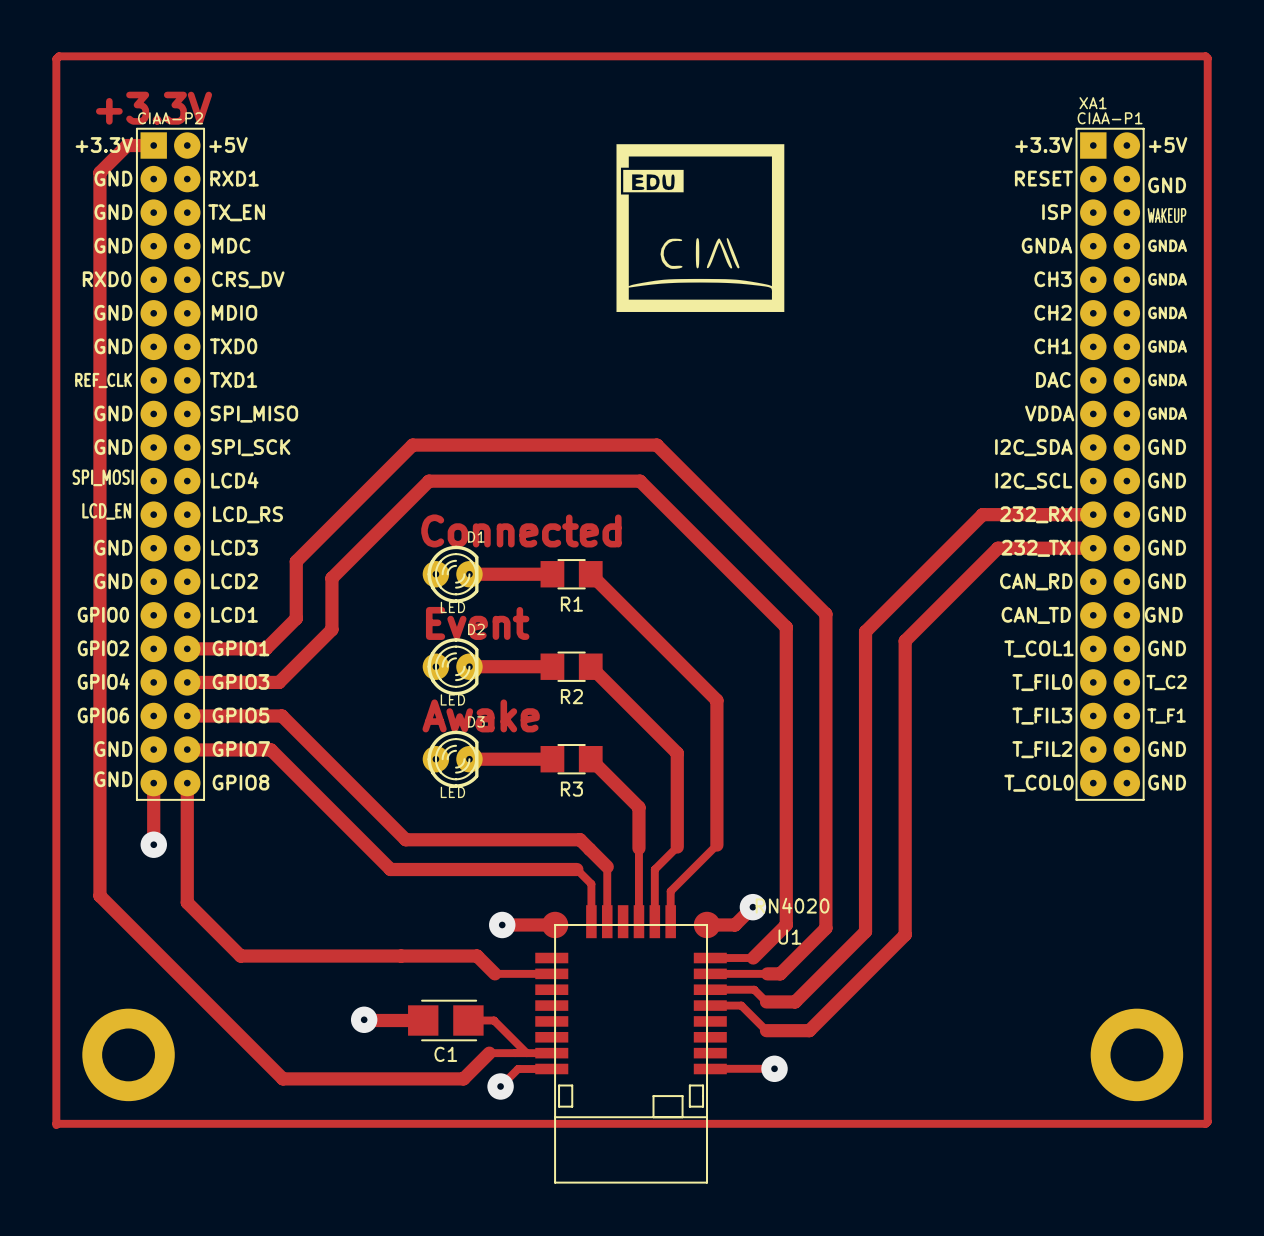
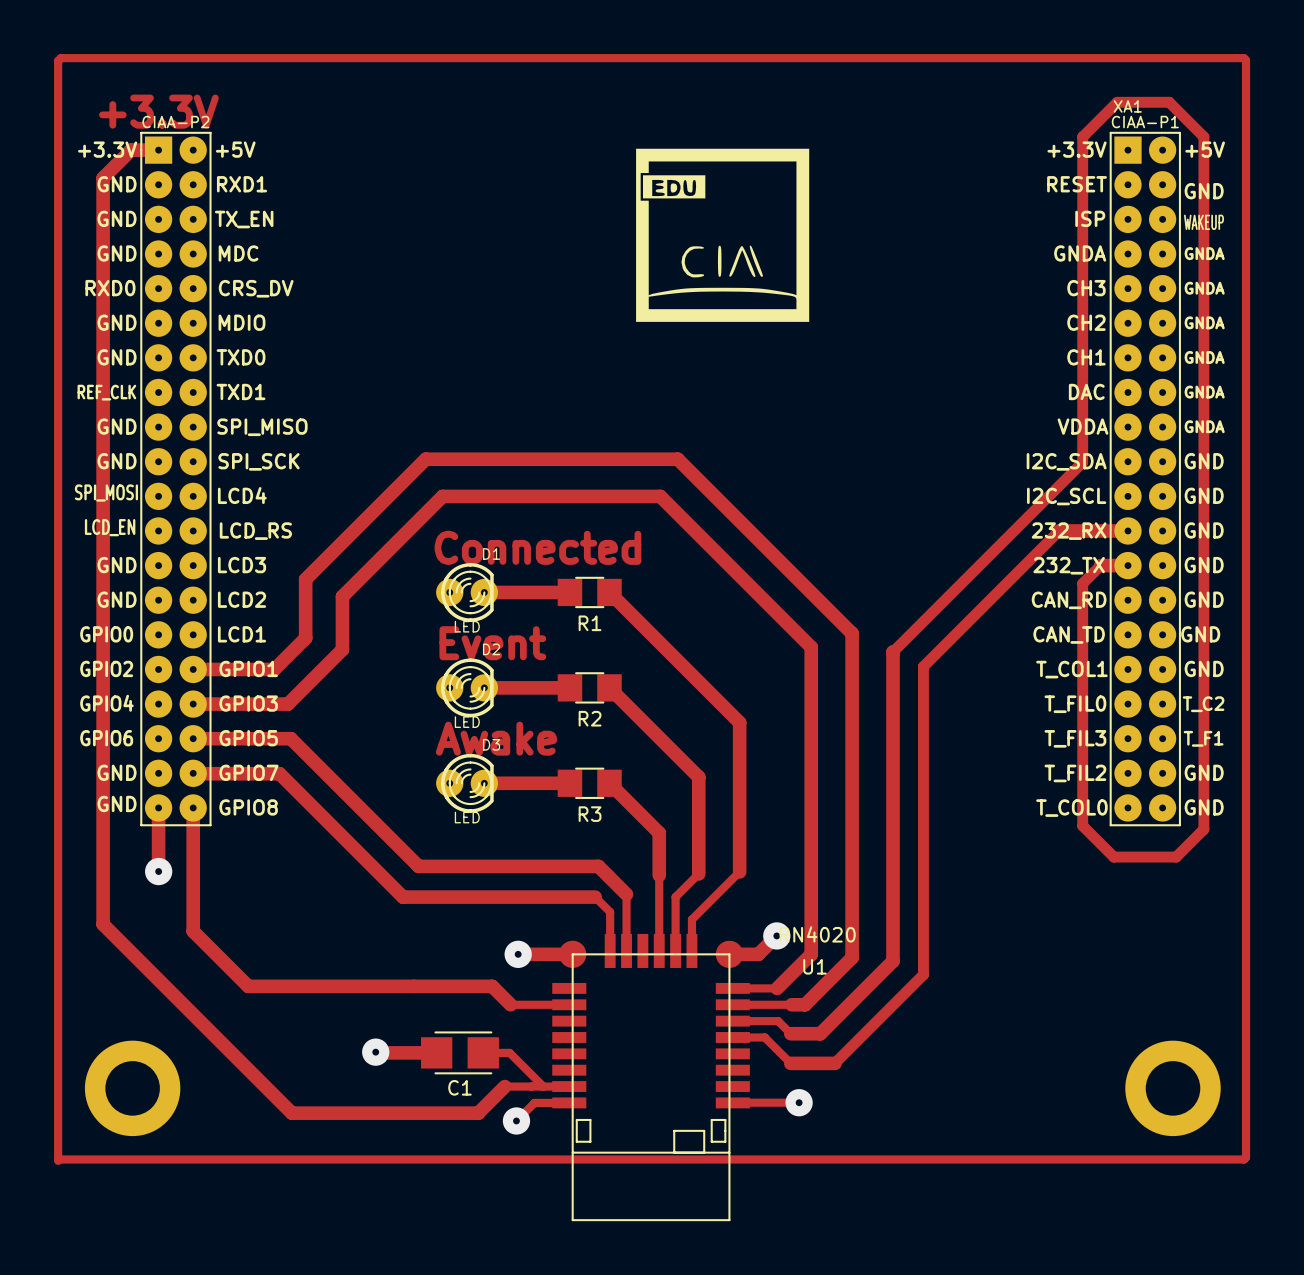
track: (1026, 514) (982, 514) (865, 631) -> none
track: (1066, 548) (997, 548) (905, 640) (905, 934) (809, 1030) -> (1059, 530) (923, 666) (923, 974) (834, 1063)
track: none -> (1100, 565) (1082, 583) (1082, 825) (1113, 857) (1176, 857) (1203, 829) (1203, 136) (1169, 102) (1117, 102) (1082, 136) (1082, 462) (893, 652)

